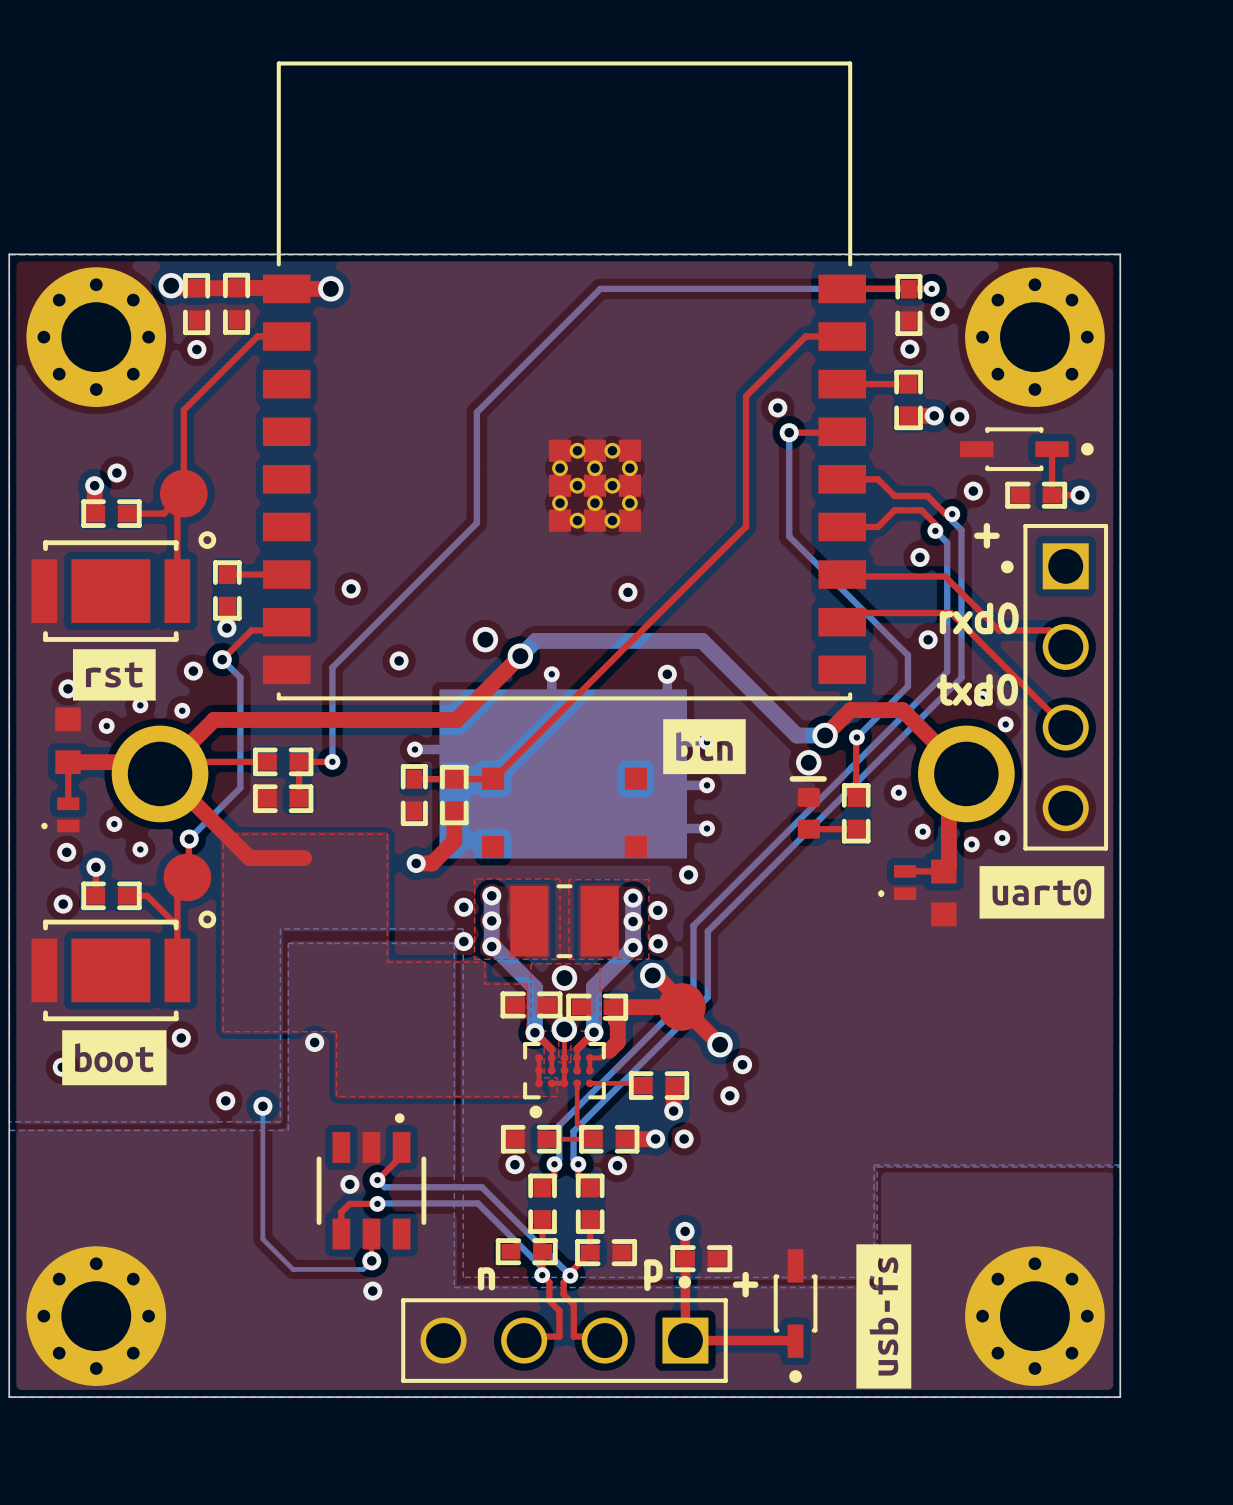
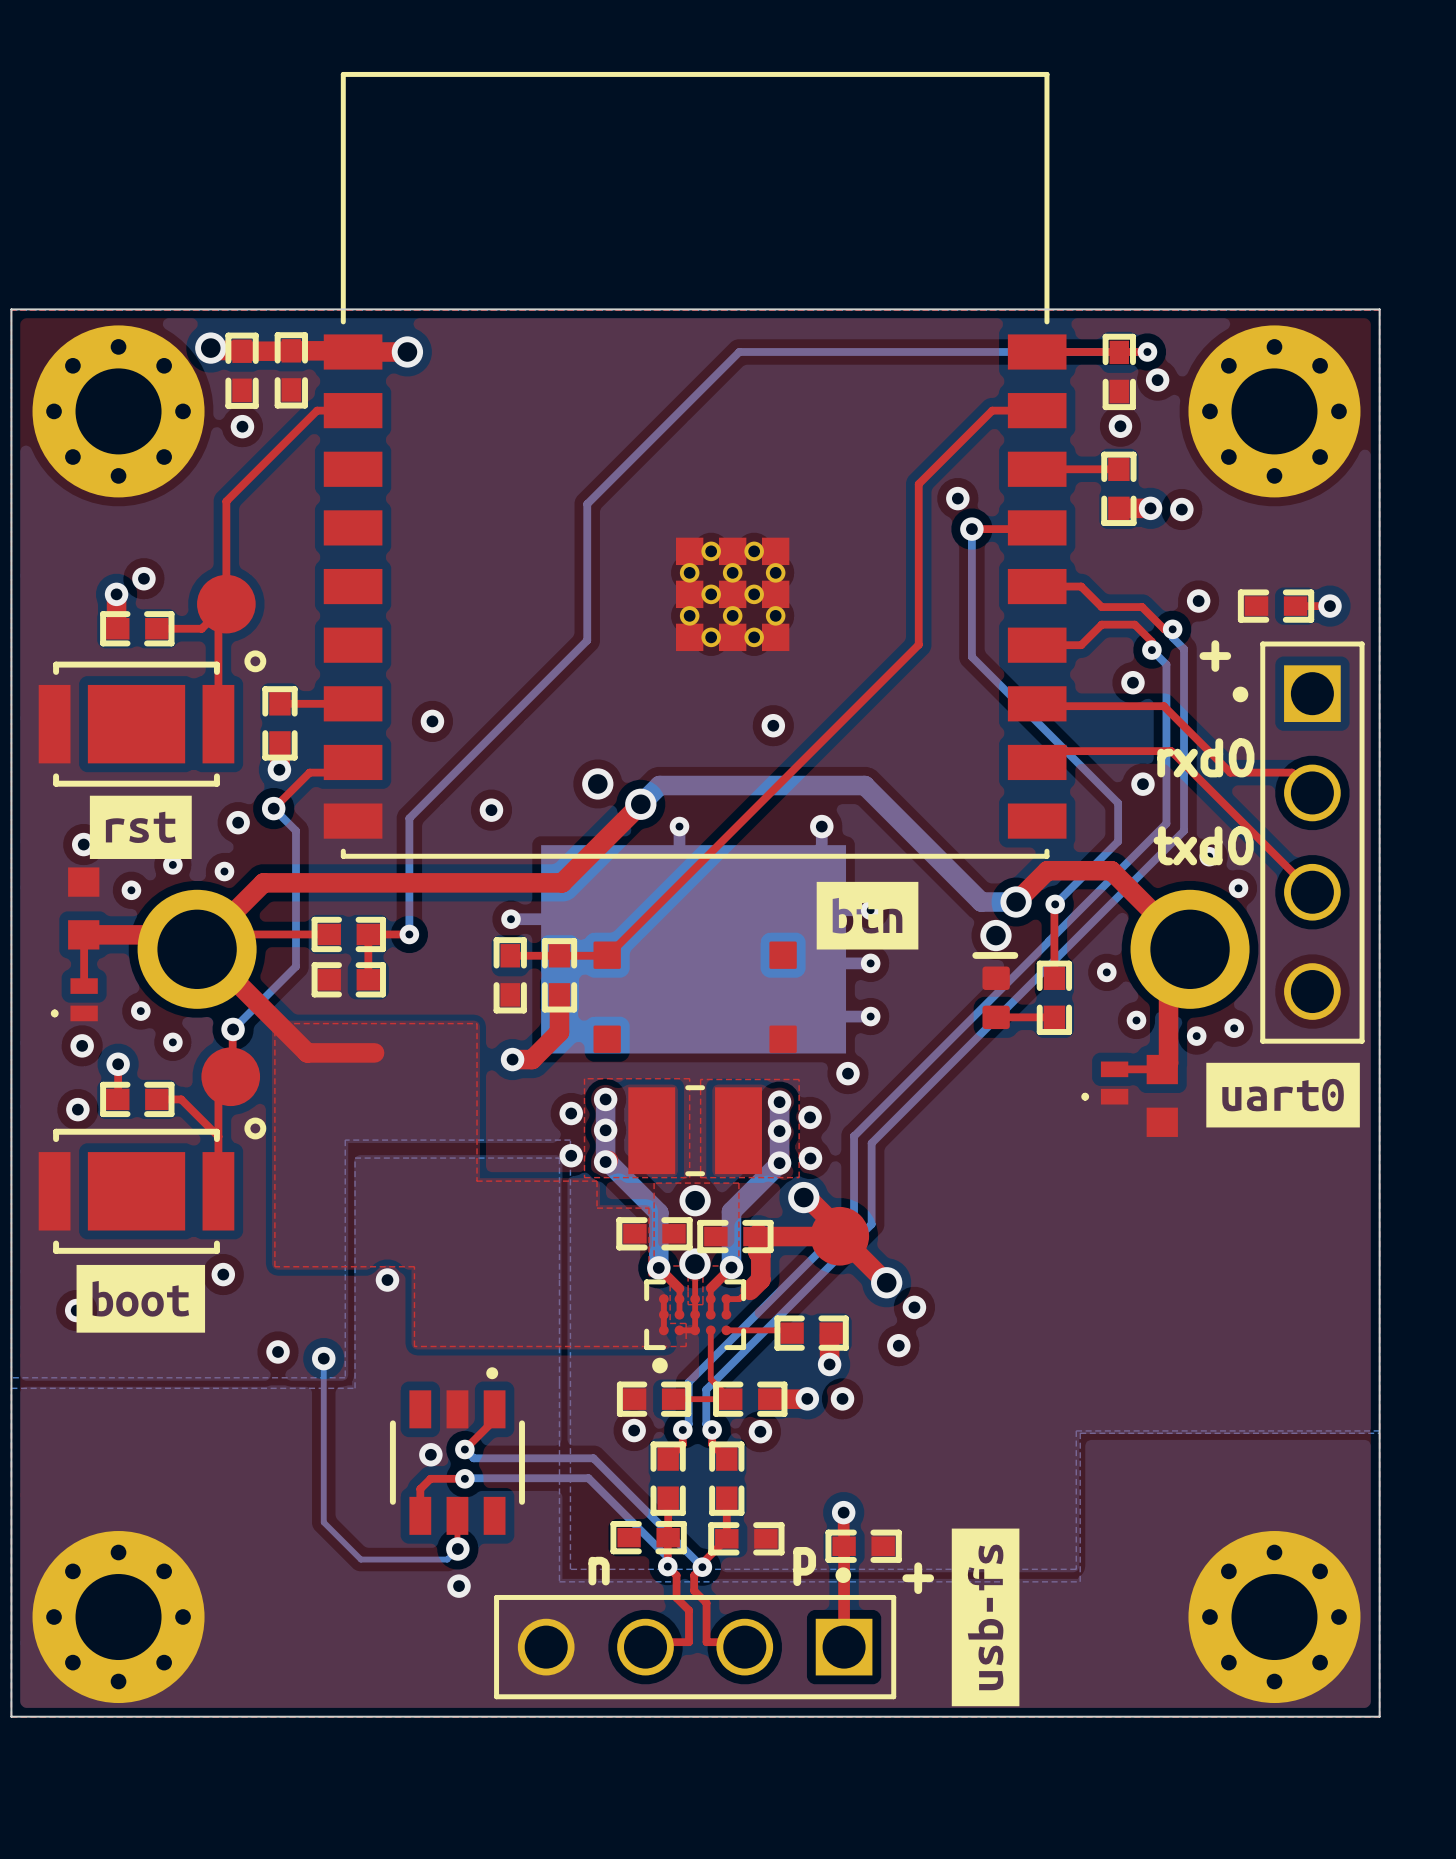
part: (1026, 449) -> none
top track: (1052, 449) (1052, 495) -> none
part: (795, 1316) -> none
drawing position: (883, 1316) -> (985, 1617)
top track: (685, 1340) (795, 1341) -> none

